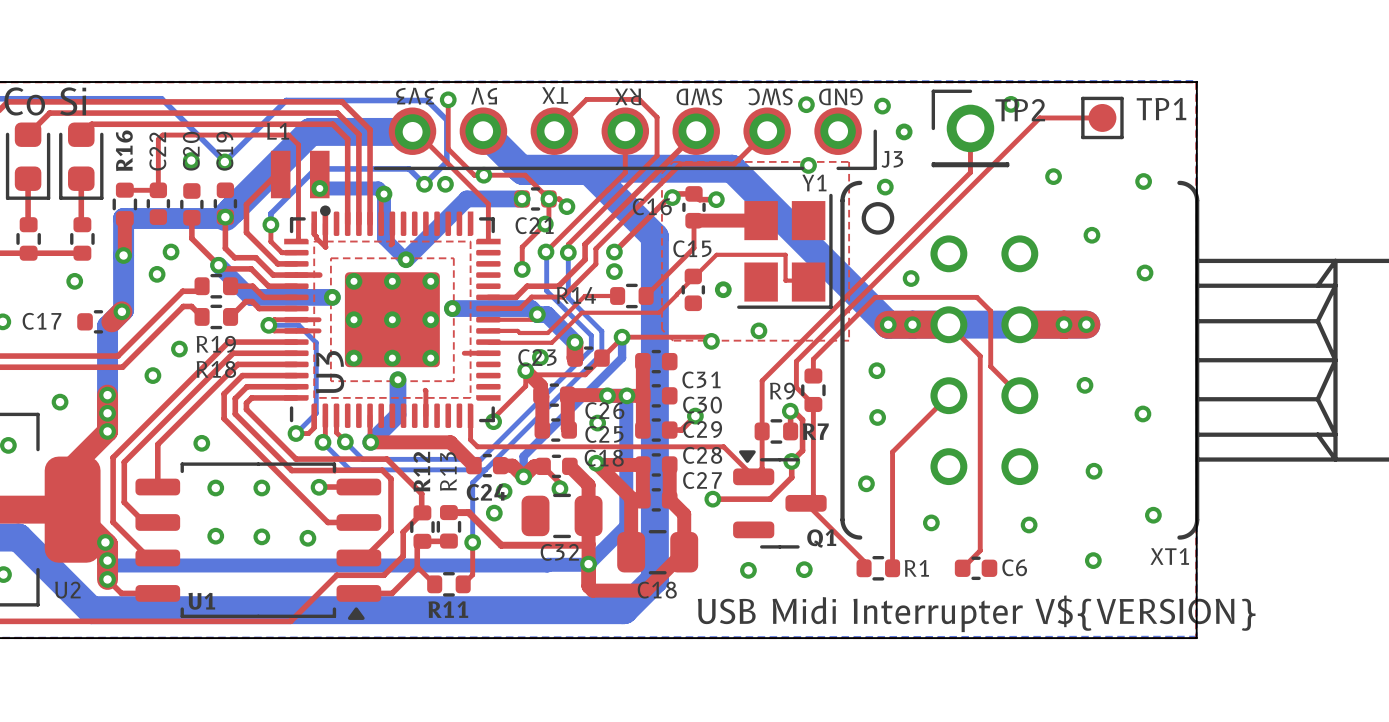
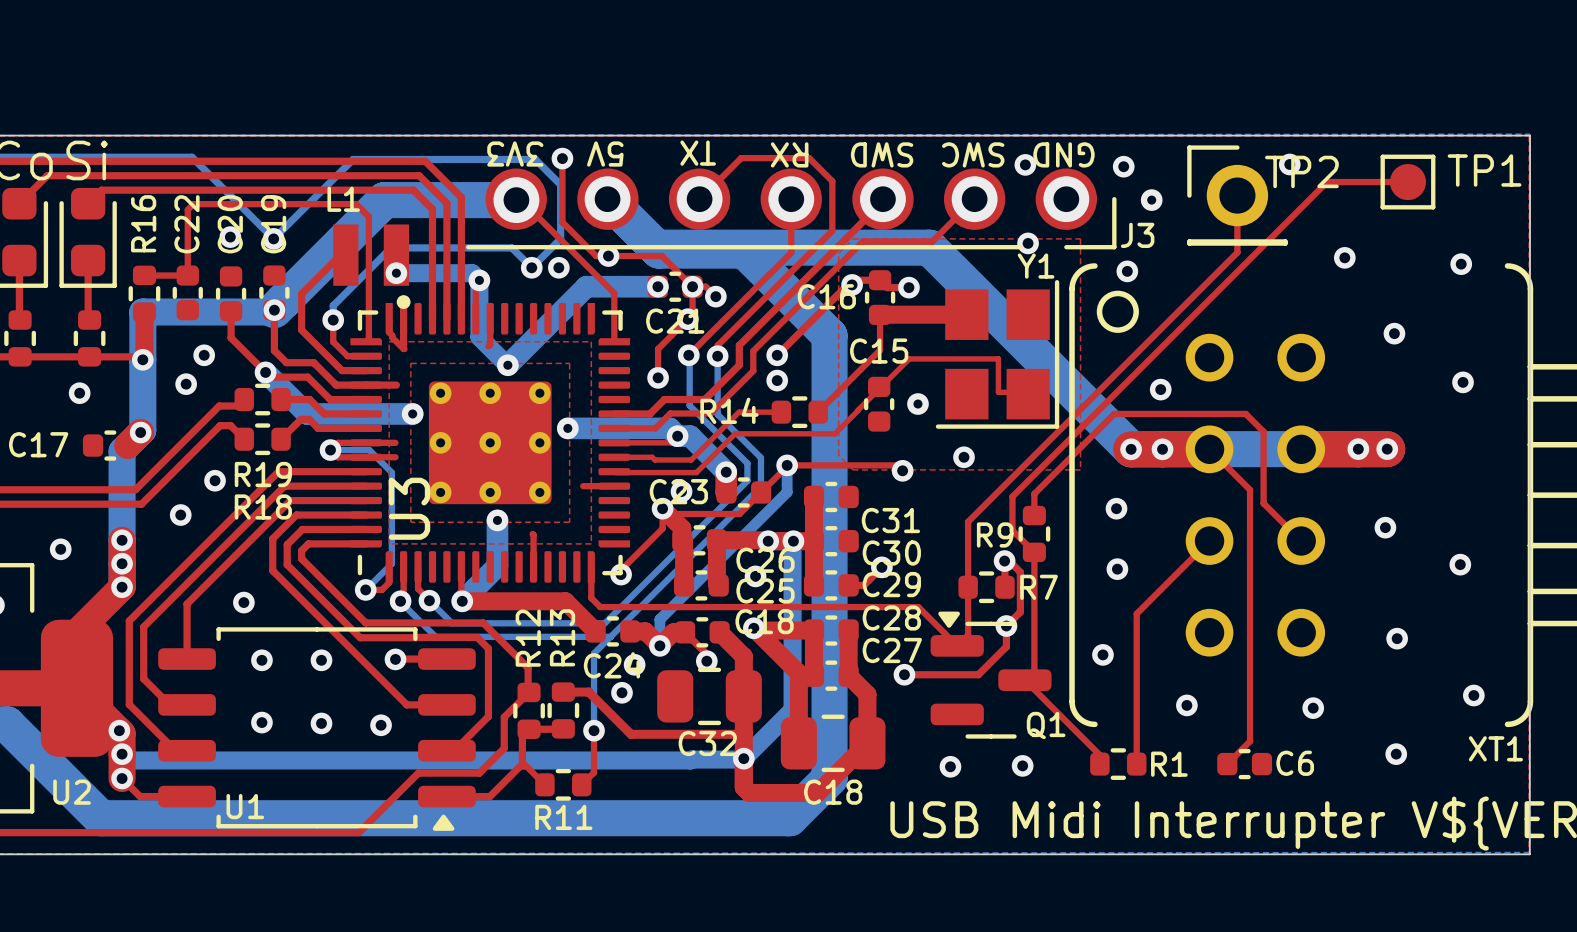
top track: none -> (89, 356) (139, 356) (142, 359)

